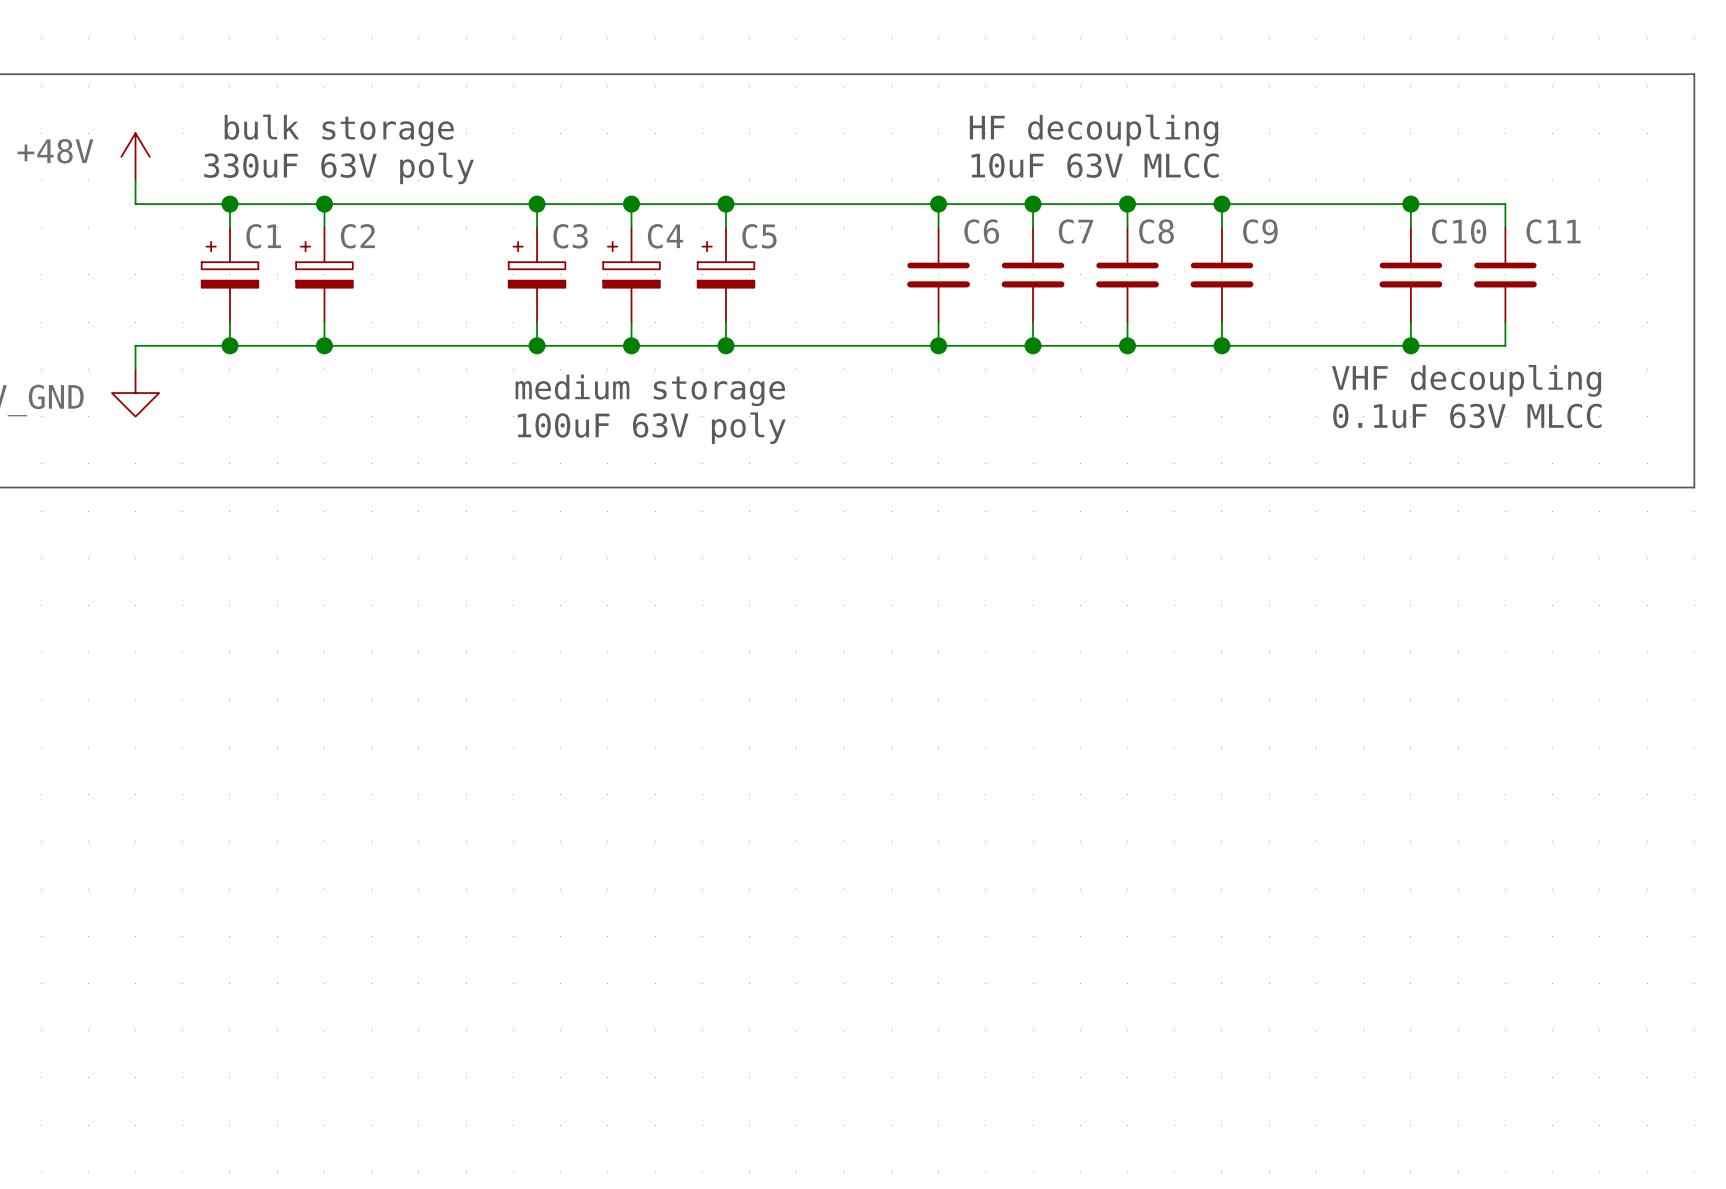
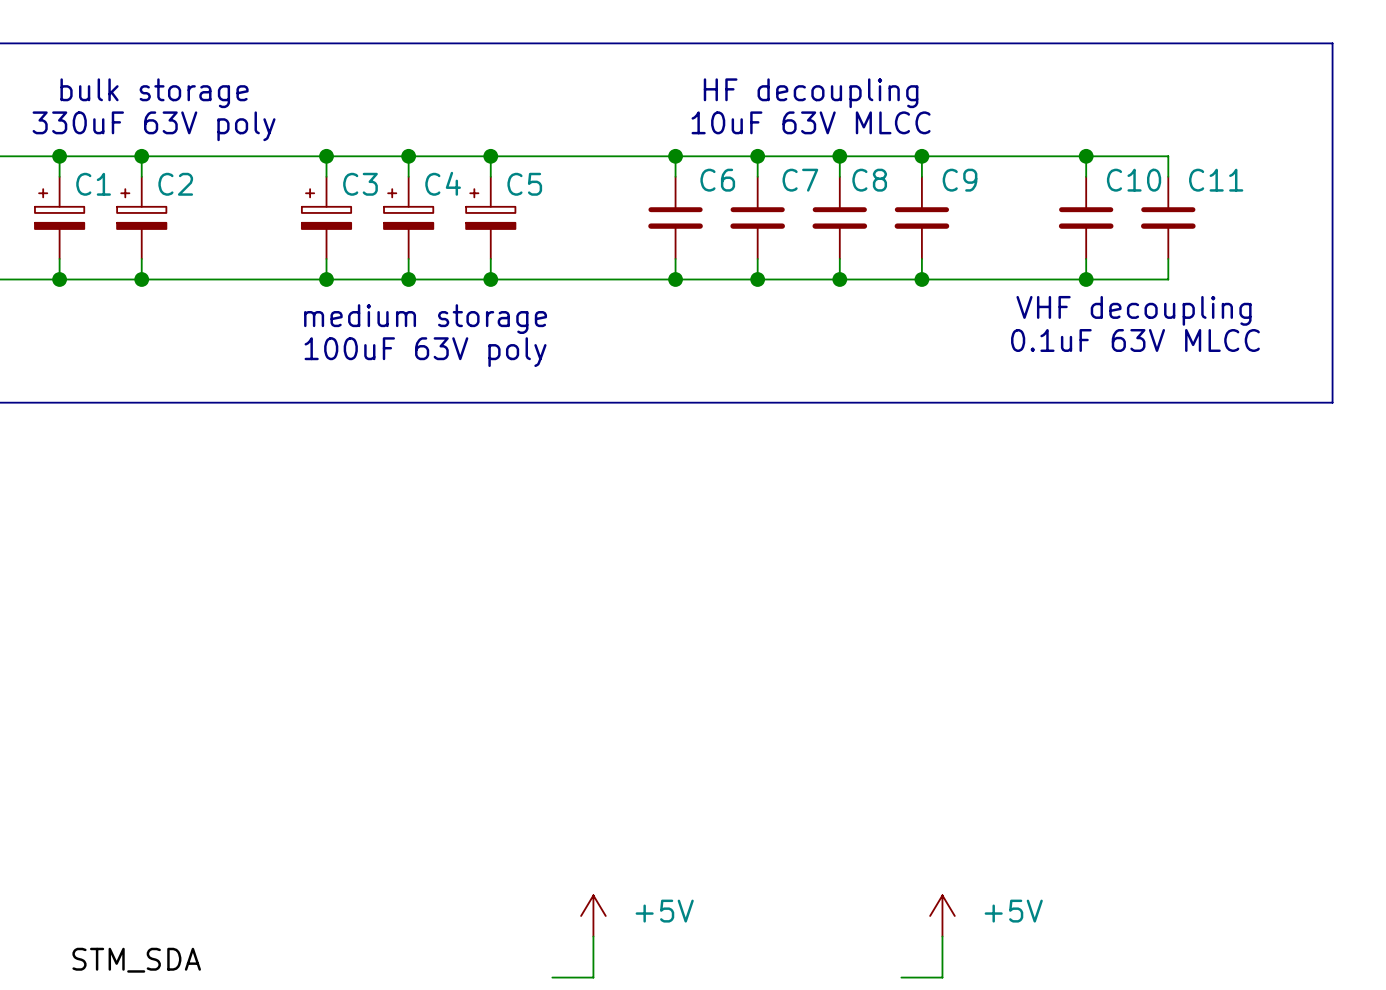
power symbol: none -> +5V (593, 915)
power symbol: none -> +5V (942, 915)
wire: none -> (593, 936) (593, 977) (552, 977)
wire: none -> (942, 936) (942, 977) (901, 977)
label: none -> STM_SDA (136, 960)

